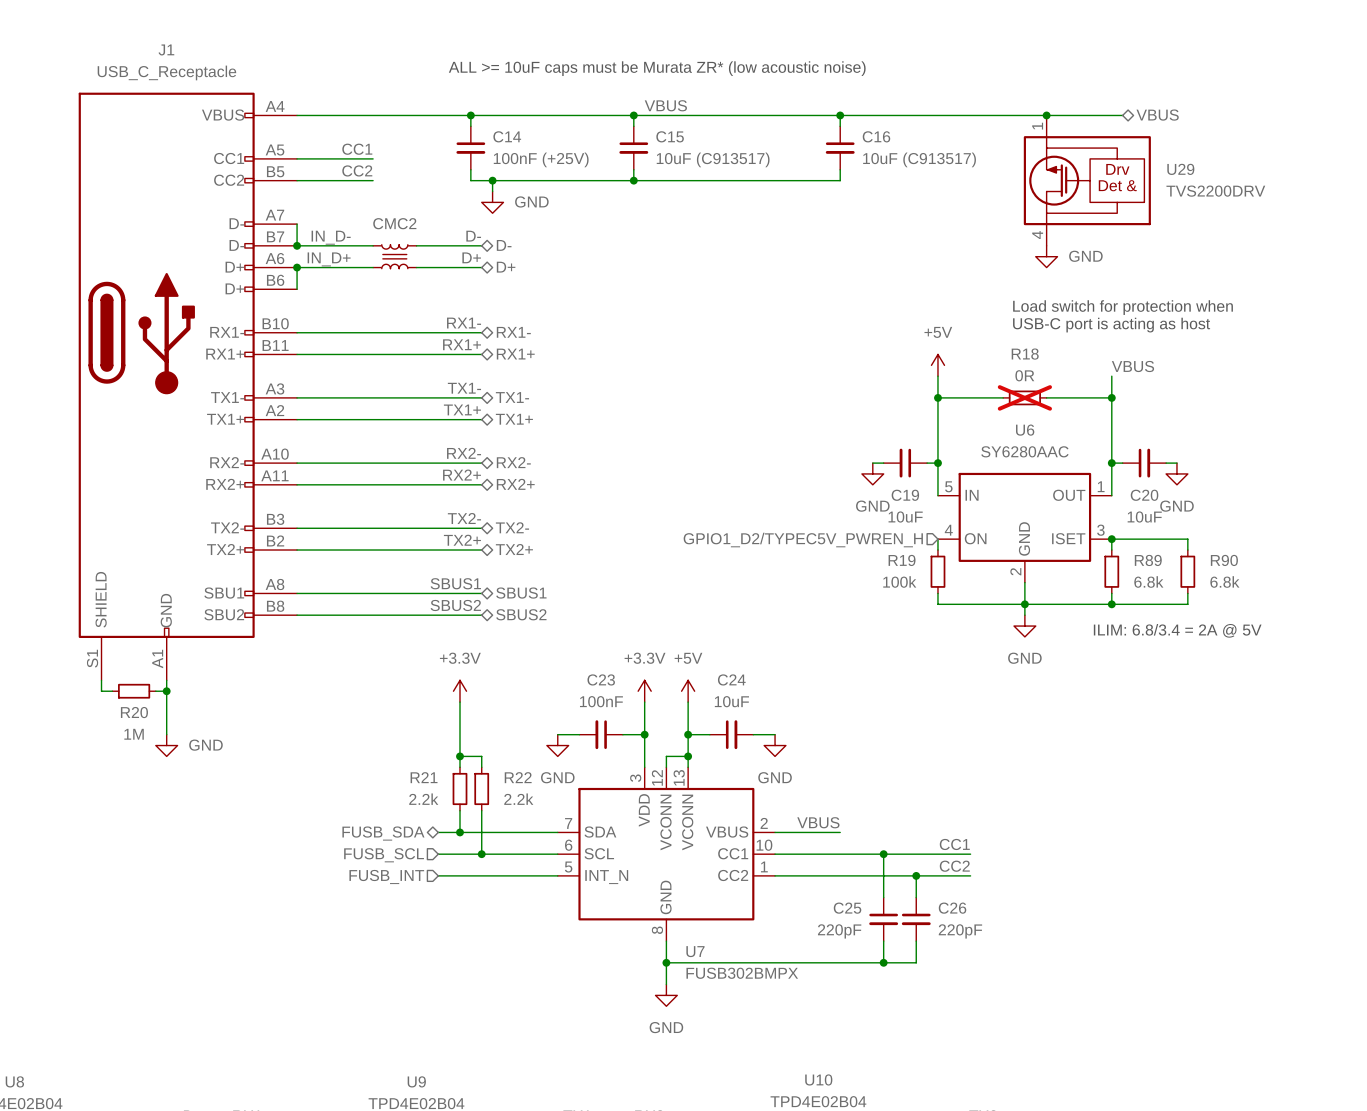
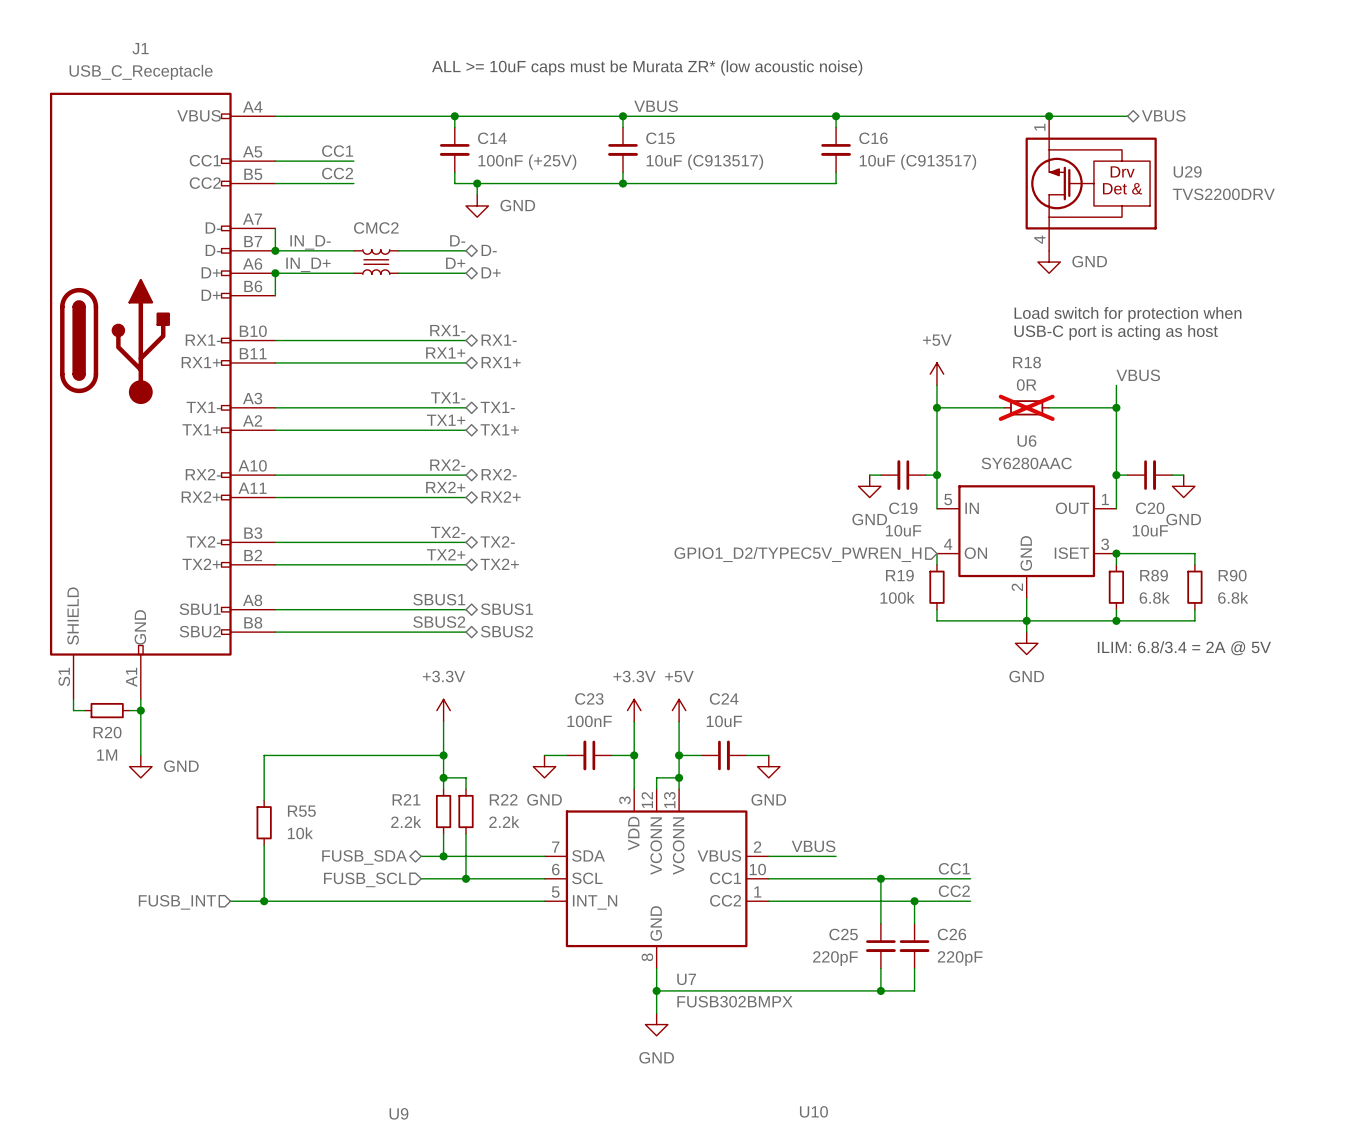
wire: none -> (443, 755) (264, 755) (264, 800)
junction: none -> (443, 755)
R55: none -> 10k (264, 822)
wire: none -> (264, 845) (264, 901)
wire: none -> (230, 901) (421, 901)
junction: none -> (264, 901)
hierarchical label position: FUSB_INT (386, 876) -> FUSB_INT (177, 902)

